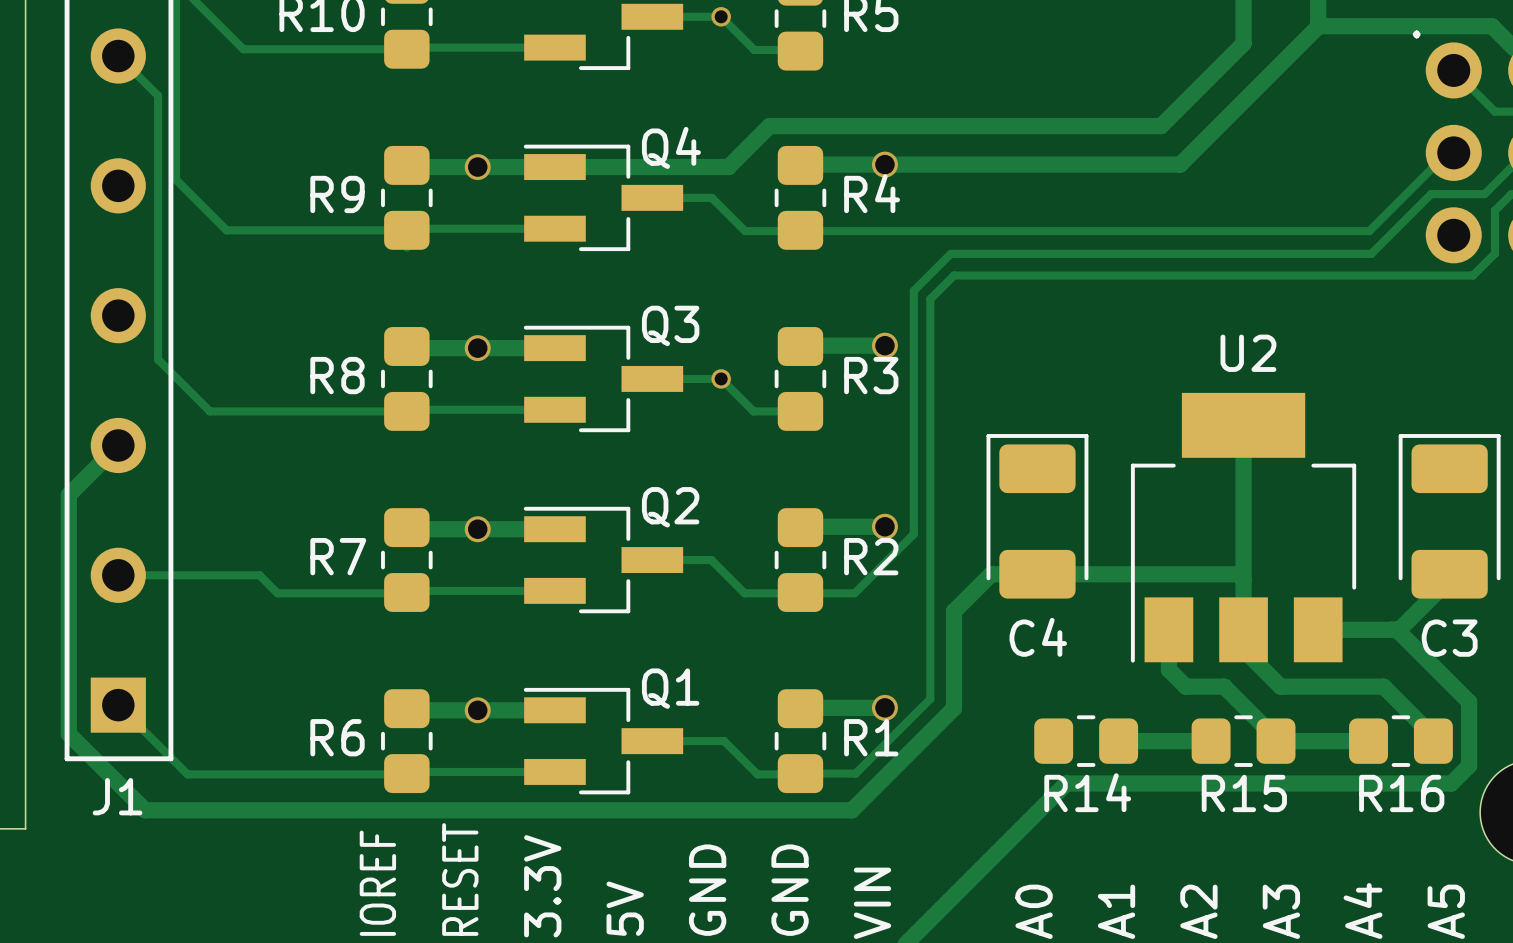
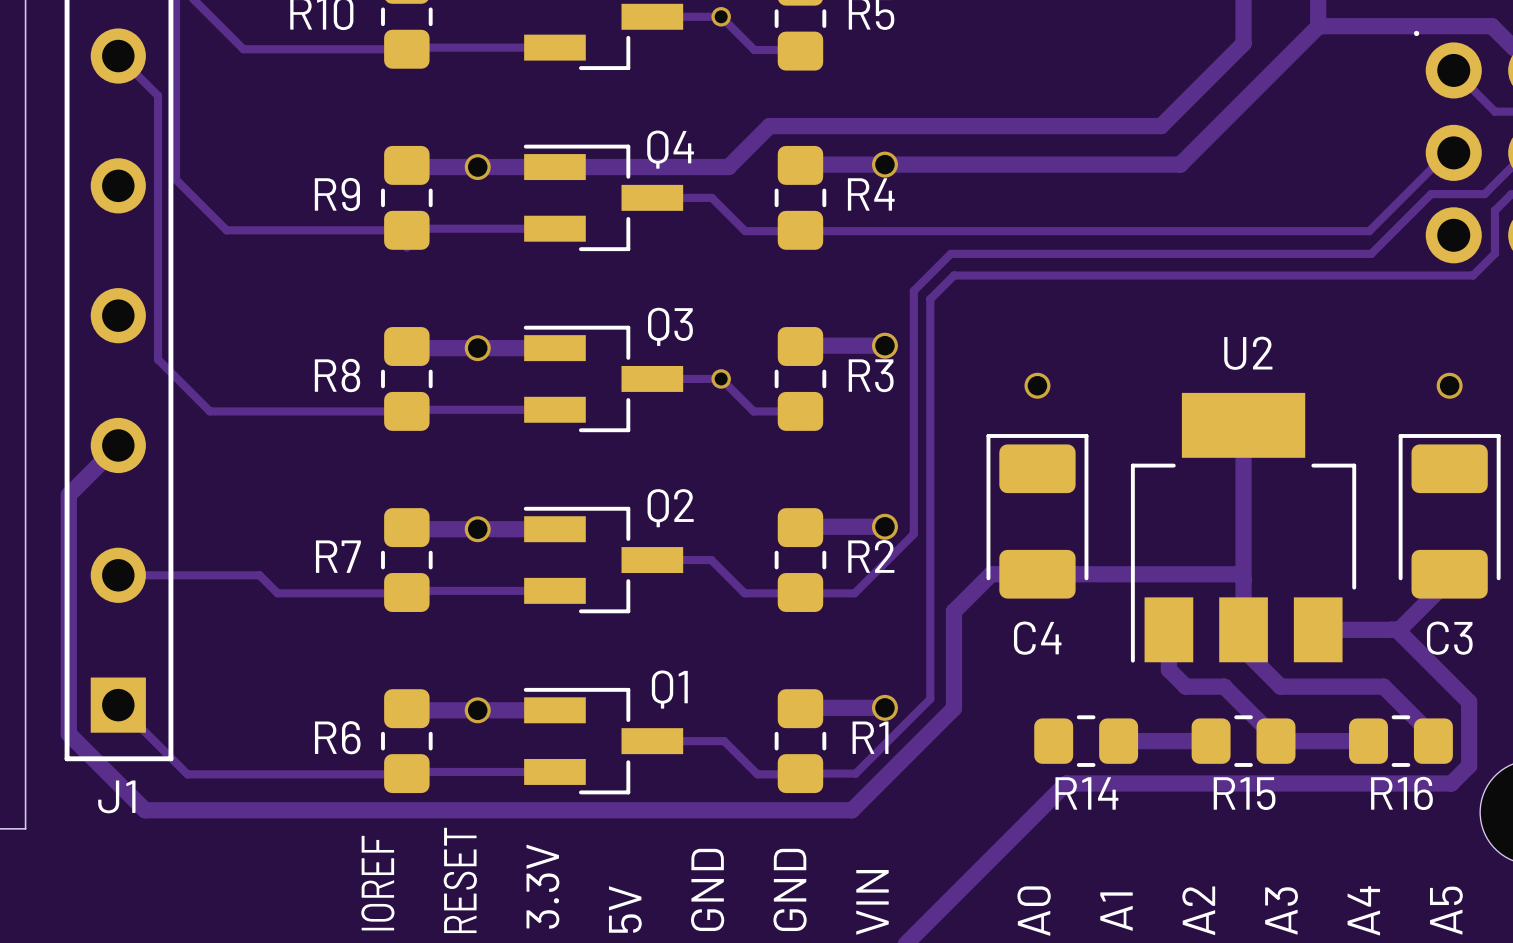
via: none -> (1037, 385)
via: none -> (1449, 385)

